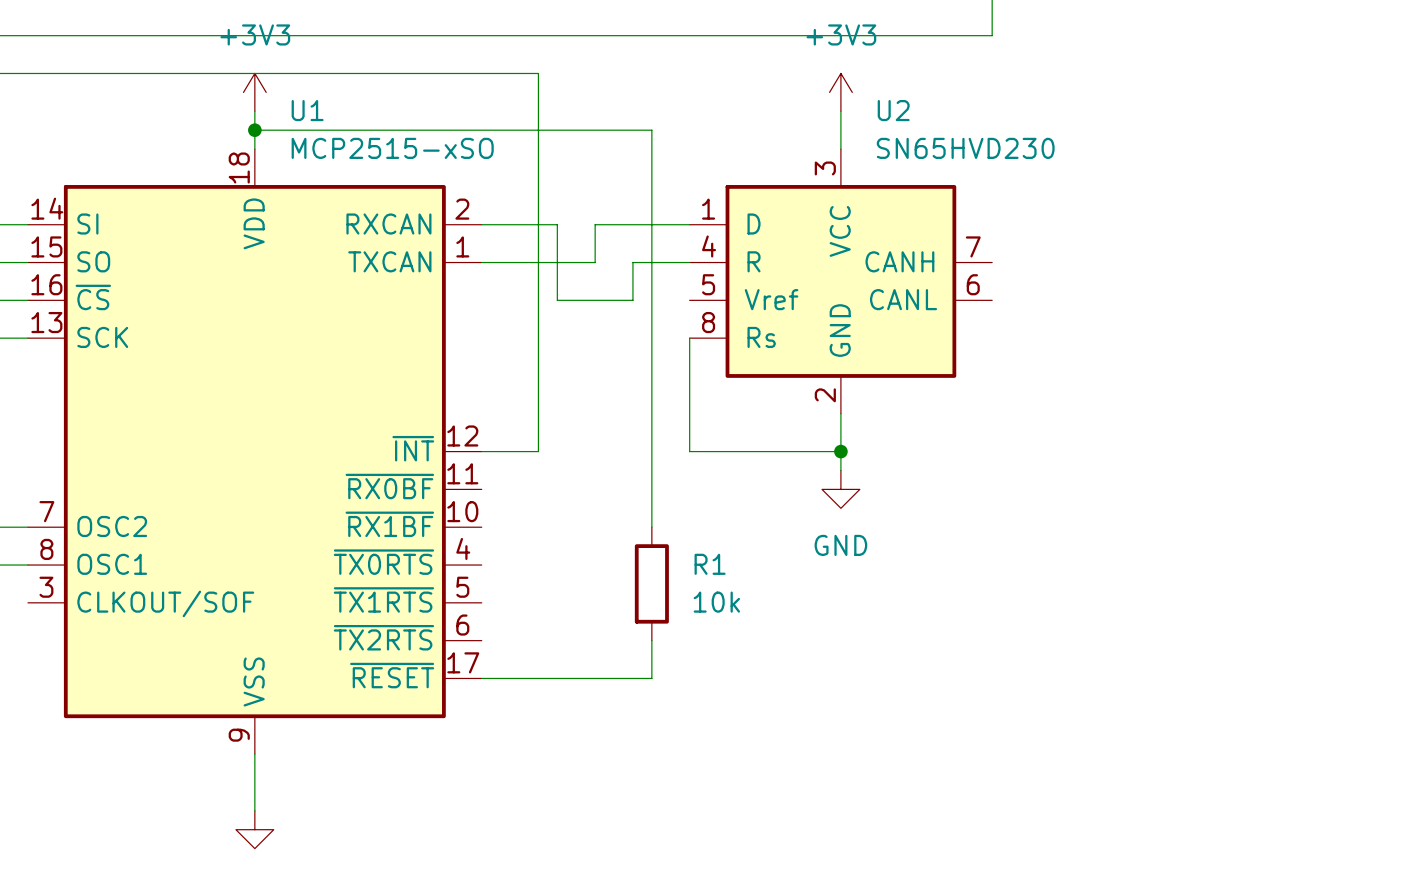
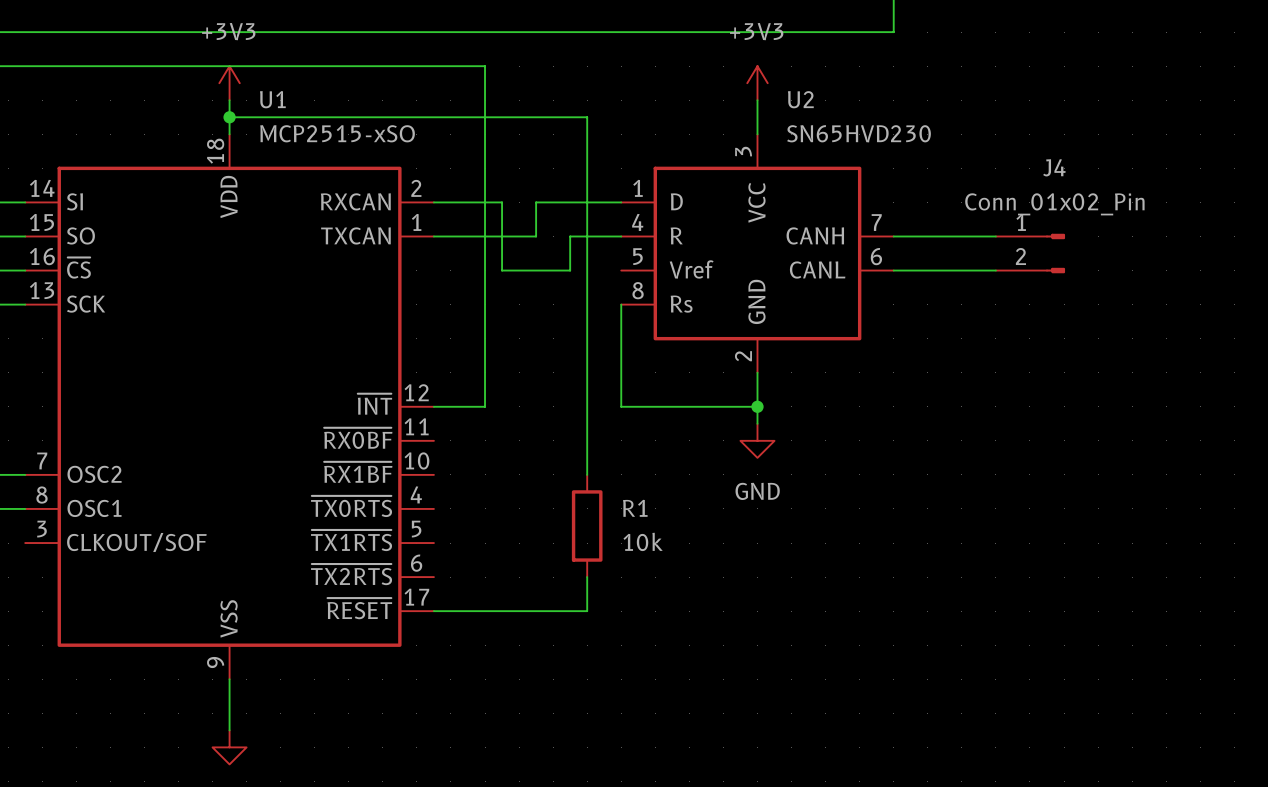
wire: none -> (893, 236) (995, 236)
J4: none -> Conn_01x02_Pin (1030, 253)
wire: none -> (893, 270) (995, 270)

